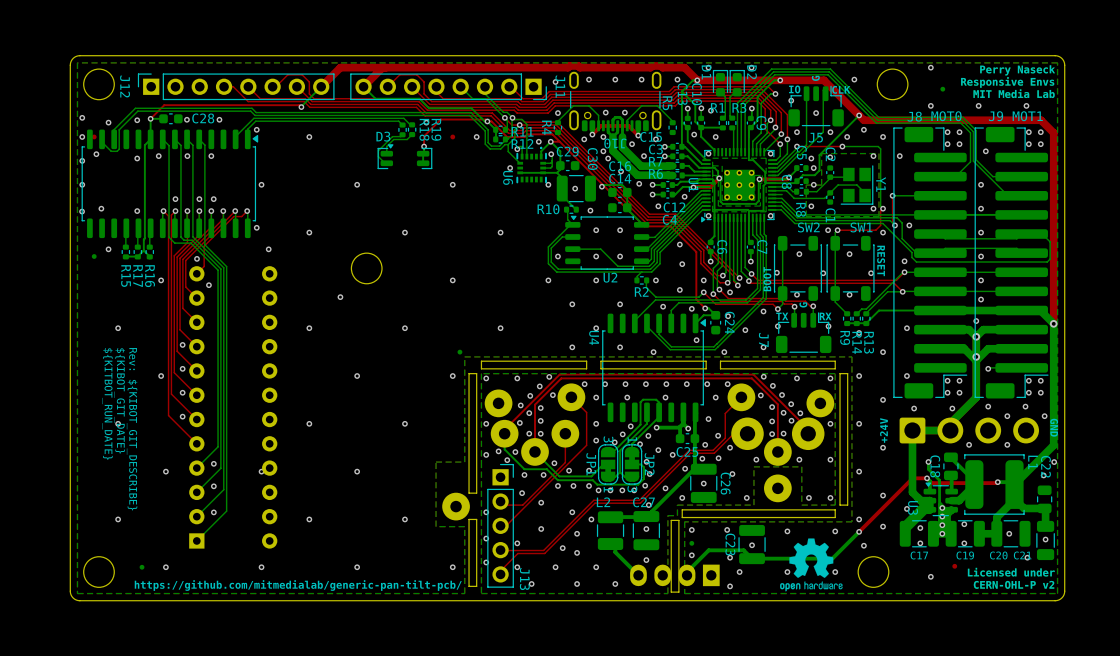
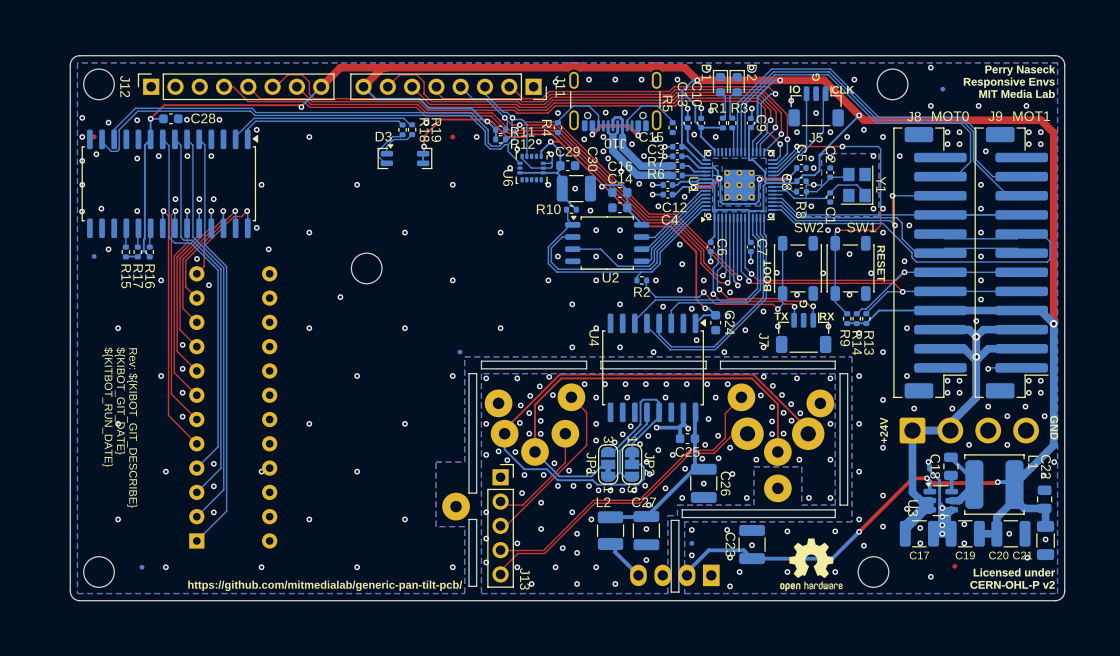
U6 footprint: [516, 146, 547, 184] -> [515, 150, 550, 185]
bottom track: (517, 149) (522, 146) (522, 156) -> none
bottom track: none -> (522, 158) (531, 168) (543, 168)

